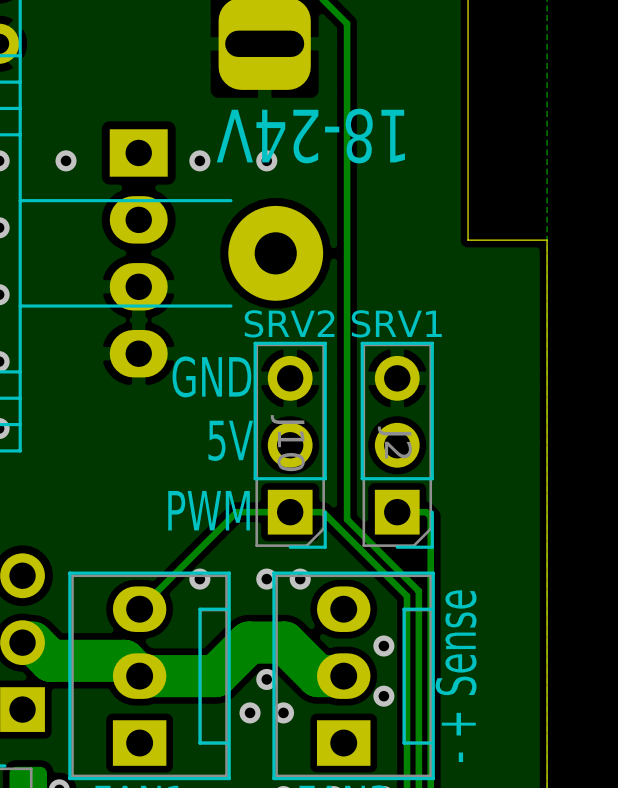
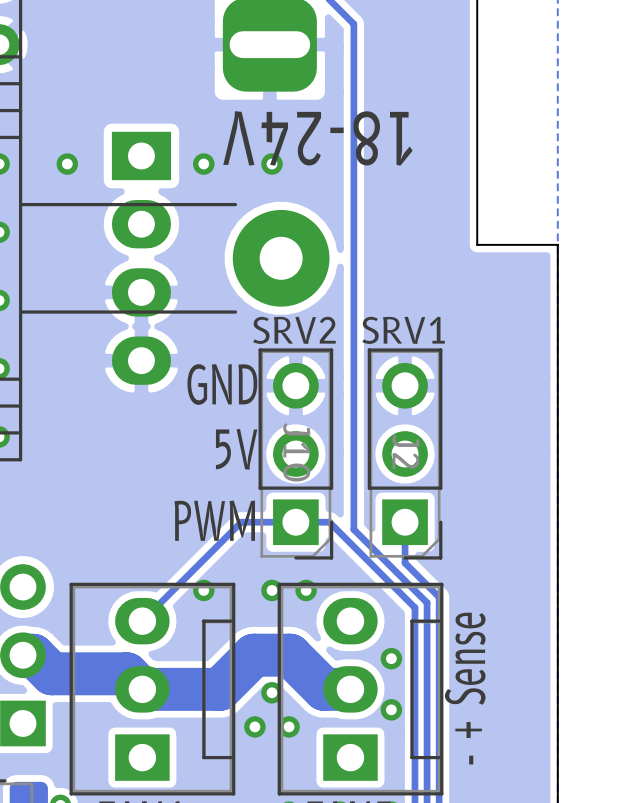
track: (397, 512) (426, 512) (430, 516) (430, 585) -> (405, 522) (405, 563) (439, 597)

